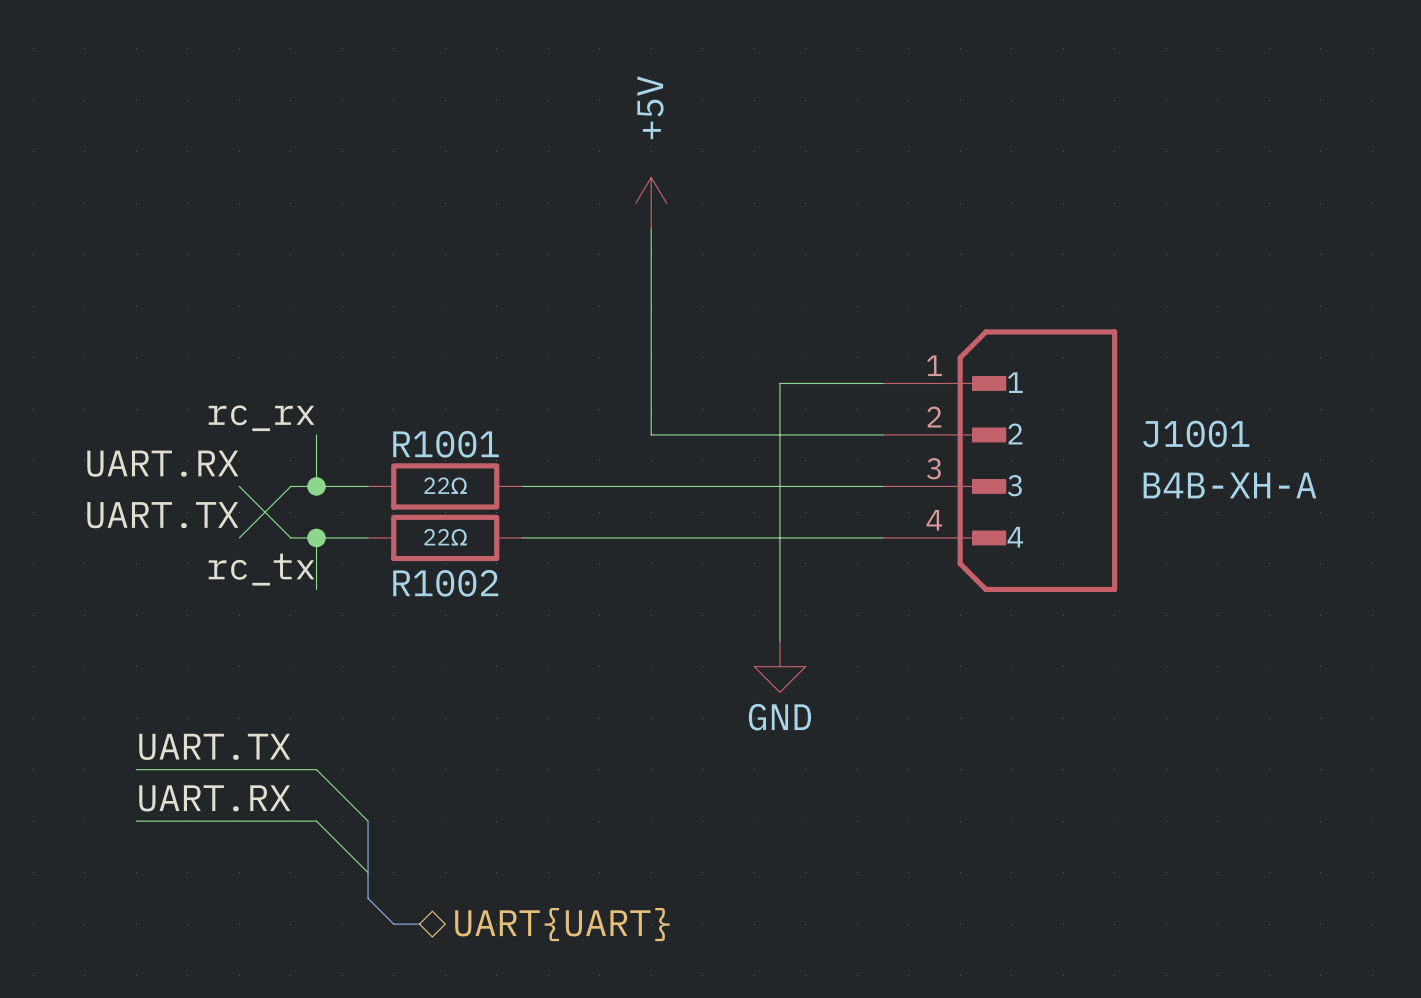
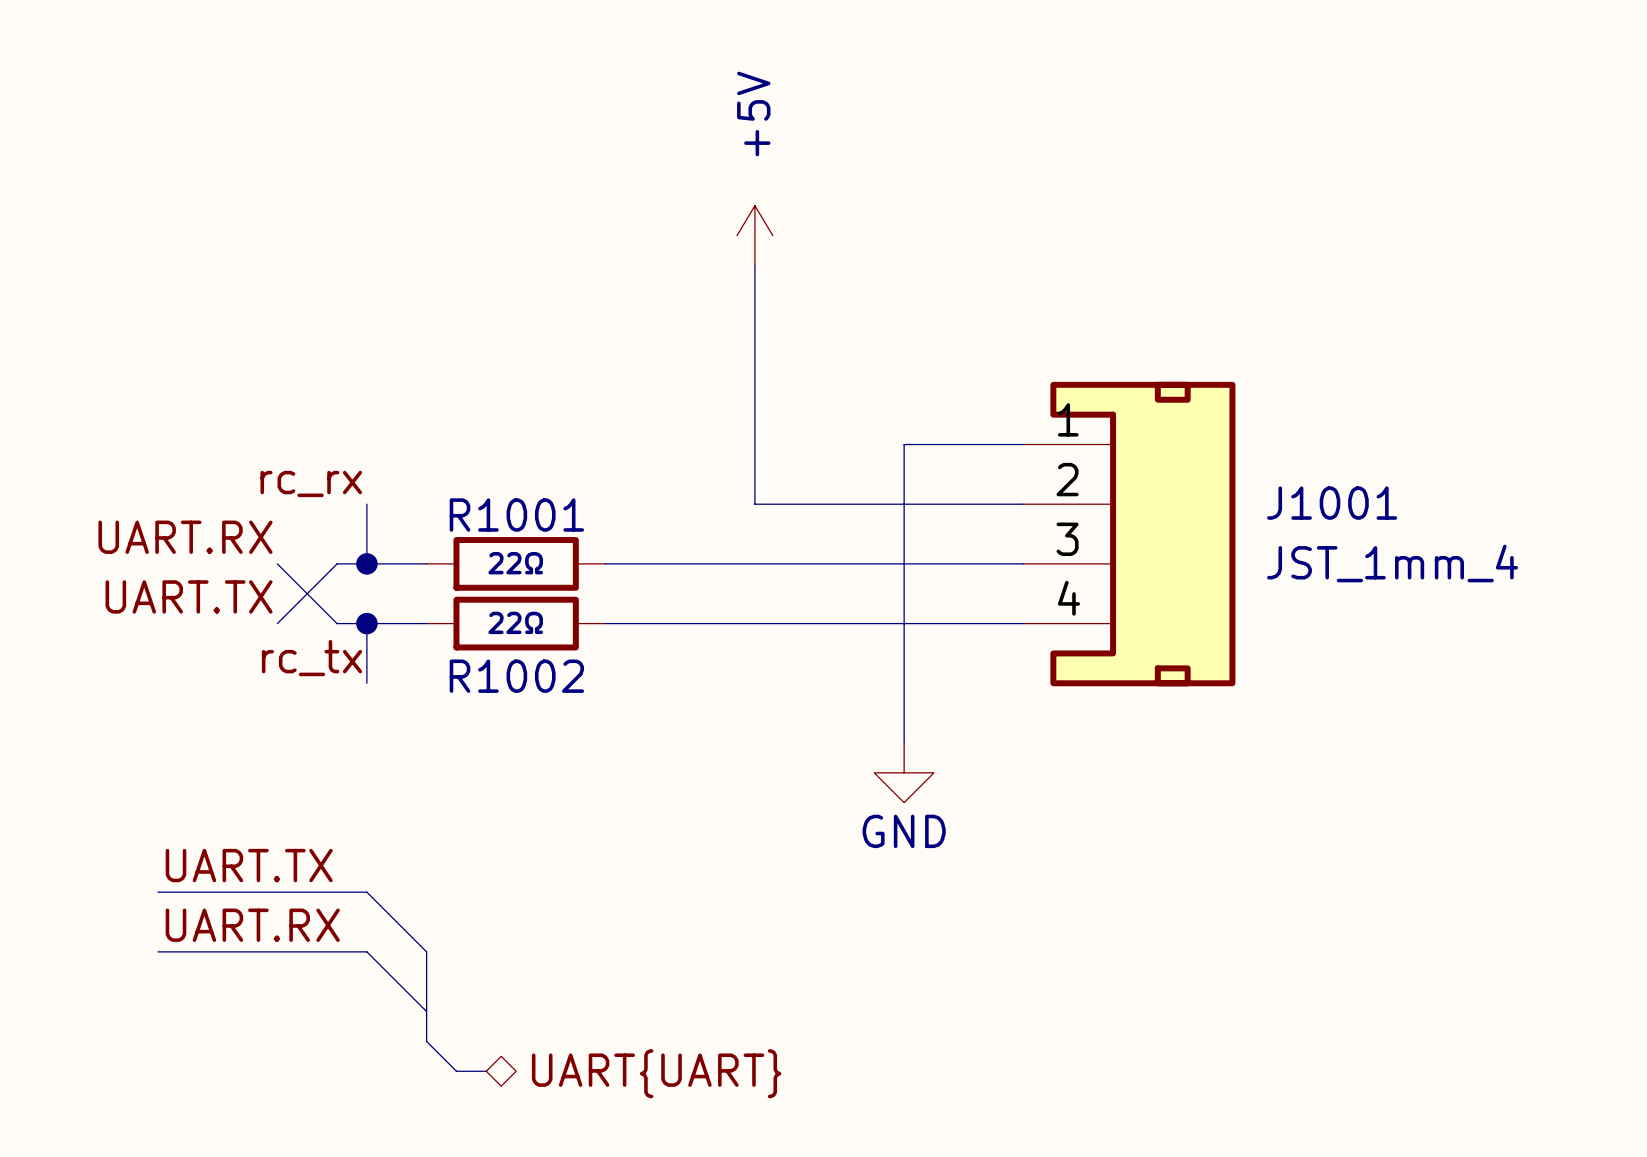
J1001 symbol: [882, 329, 1118, 593] -> [1023, 381, 1236, 687]
J1001 value: B4B-XH-A (1229, 485) -> JST_1mm_4 (1392, 563)

